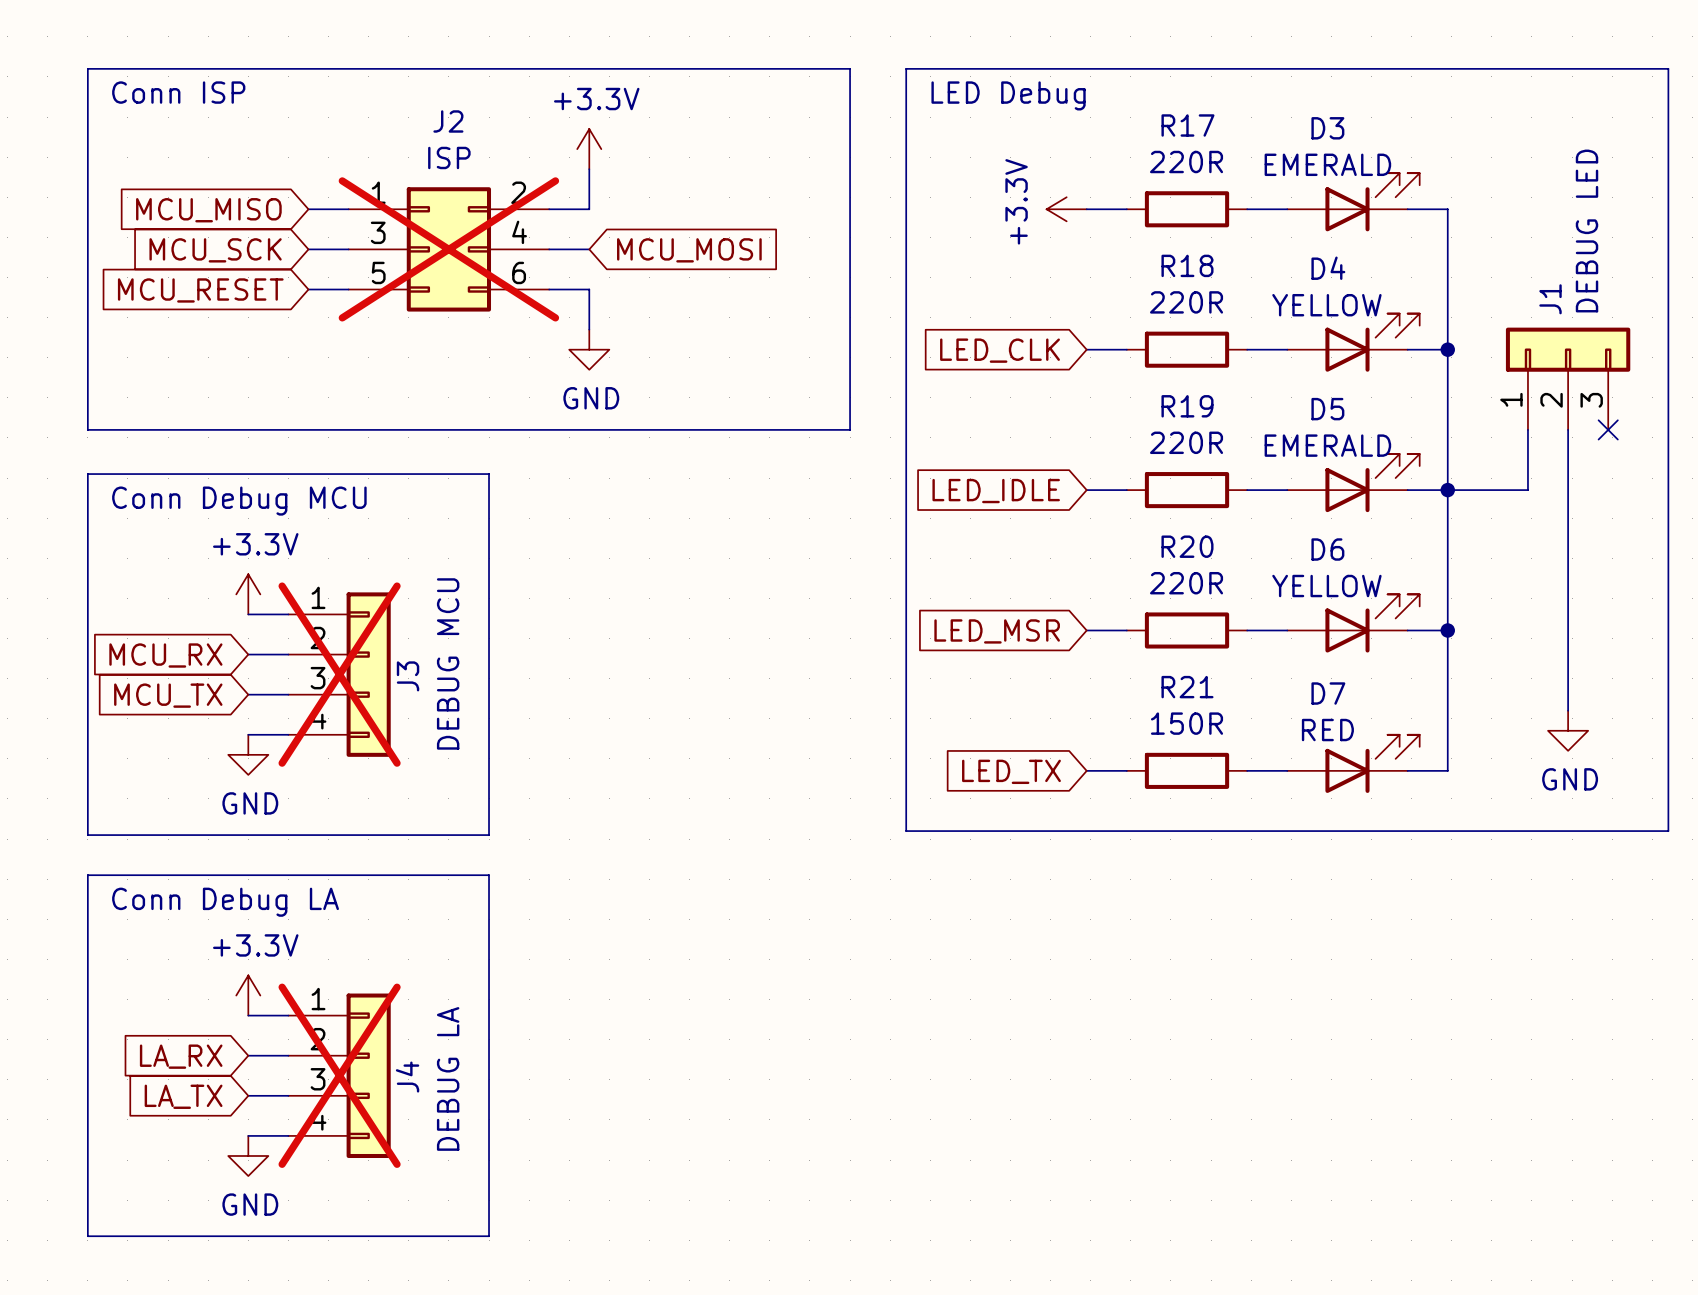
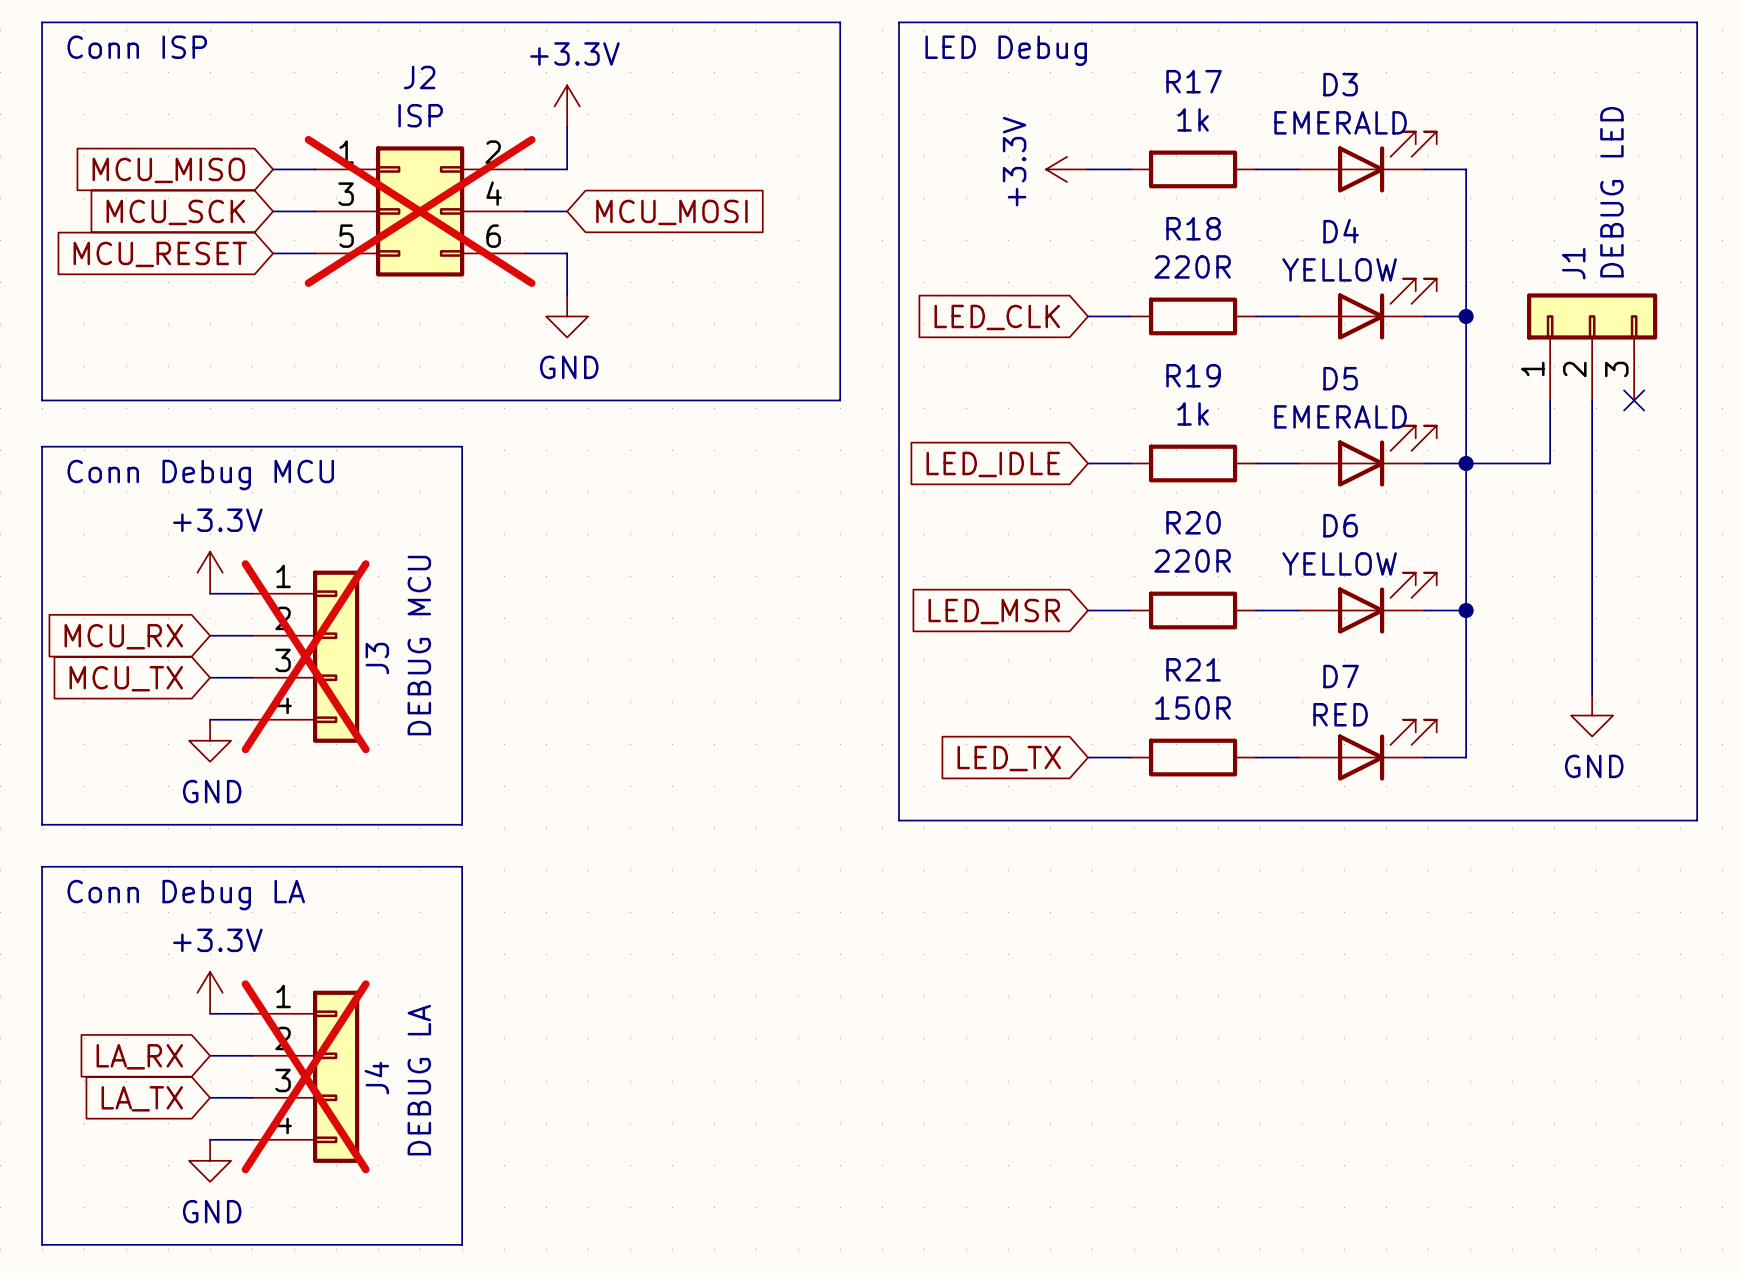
R17 value: 220R (1186, 162) -> 1k (1193, 119)
R19 value: 220R (1186, 442) -> 1k (1193, 413)

